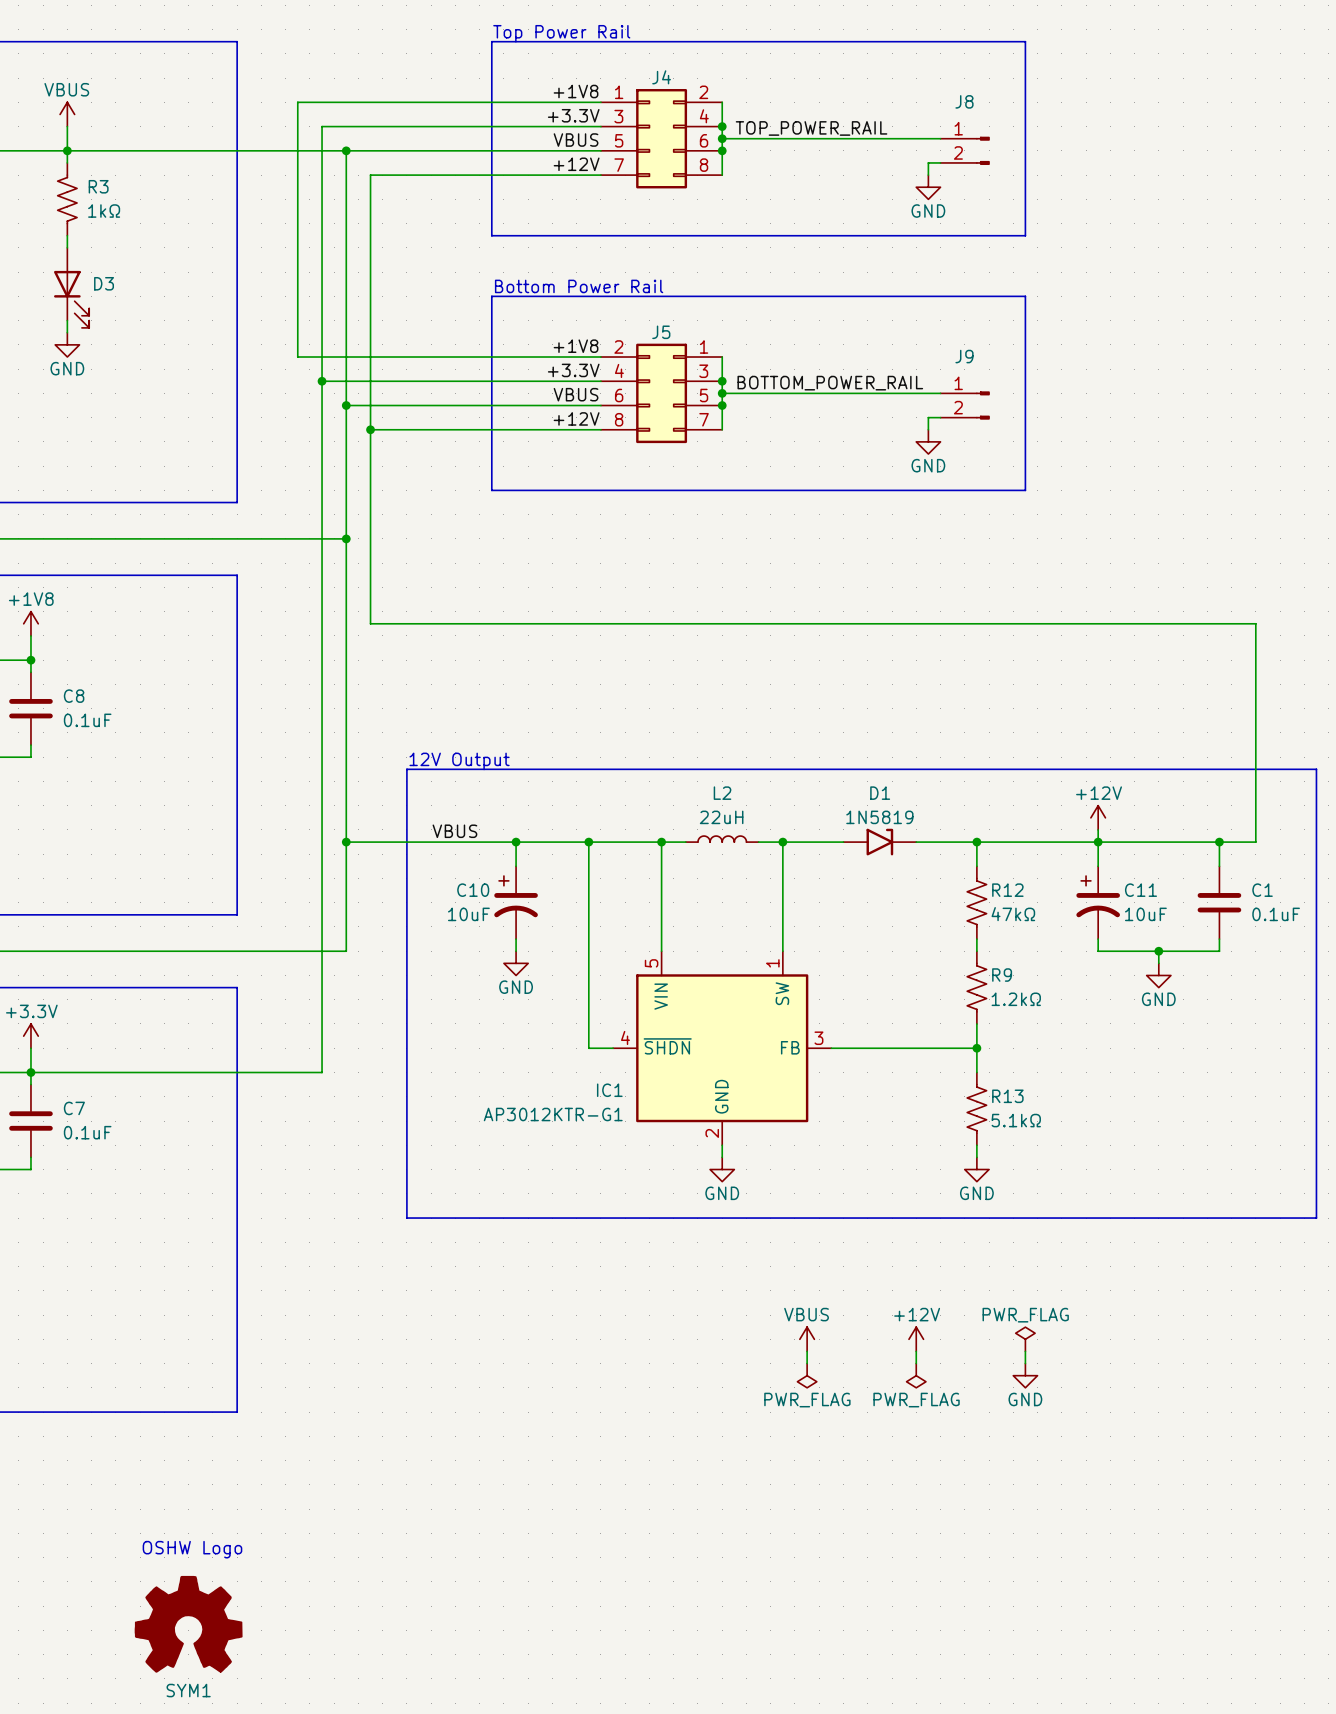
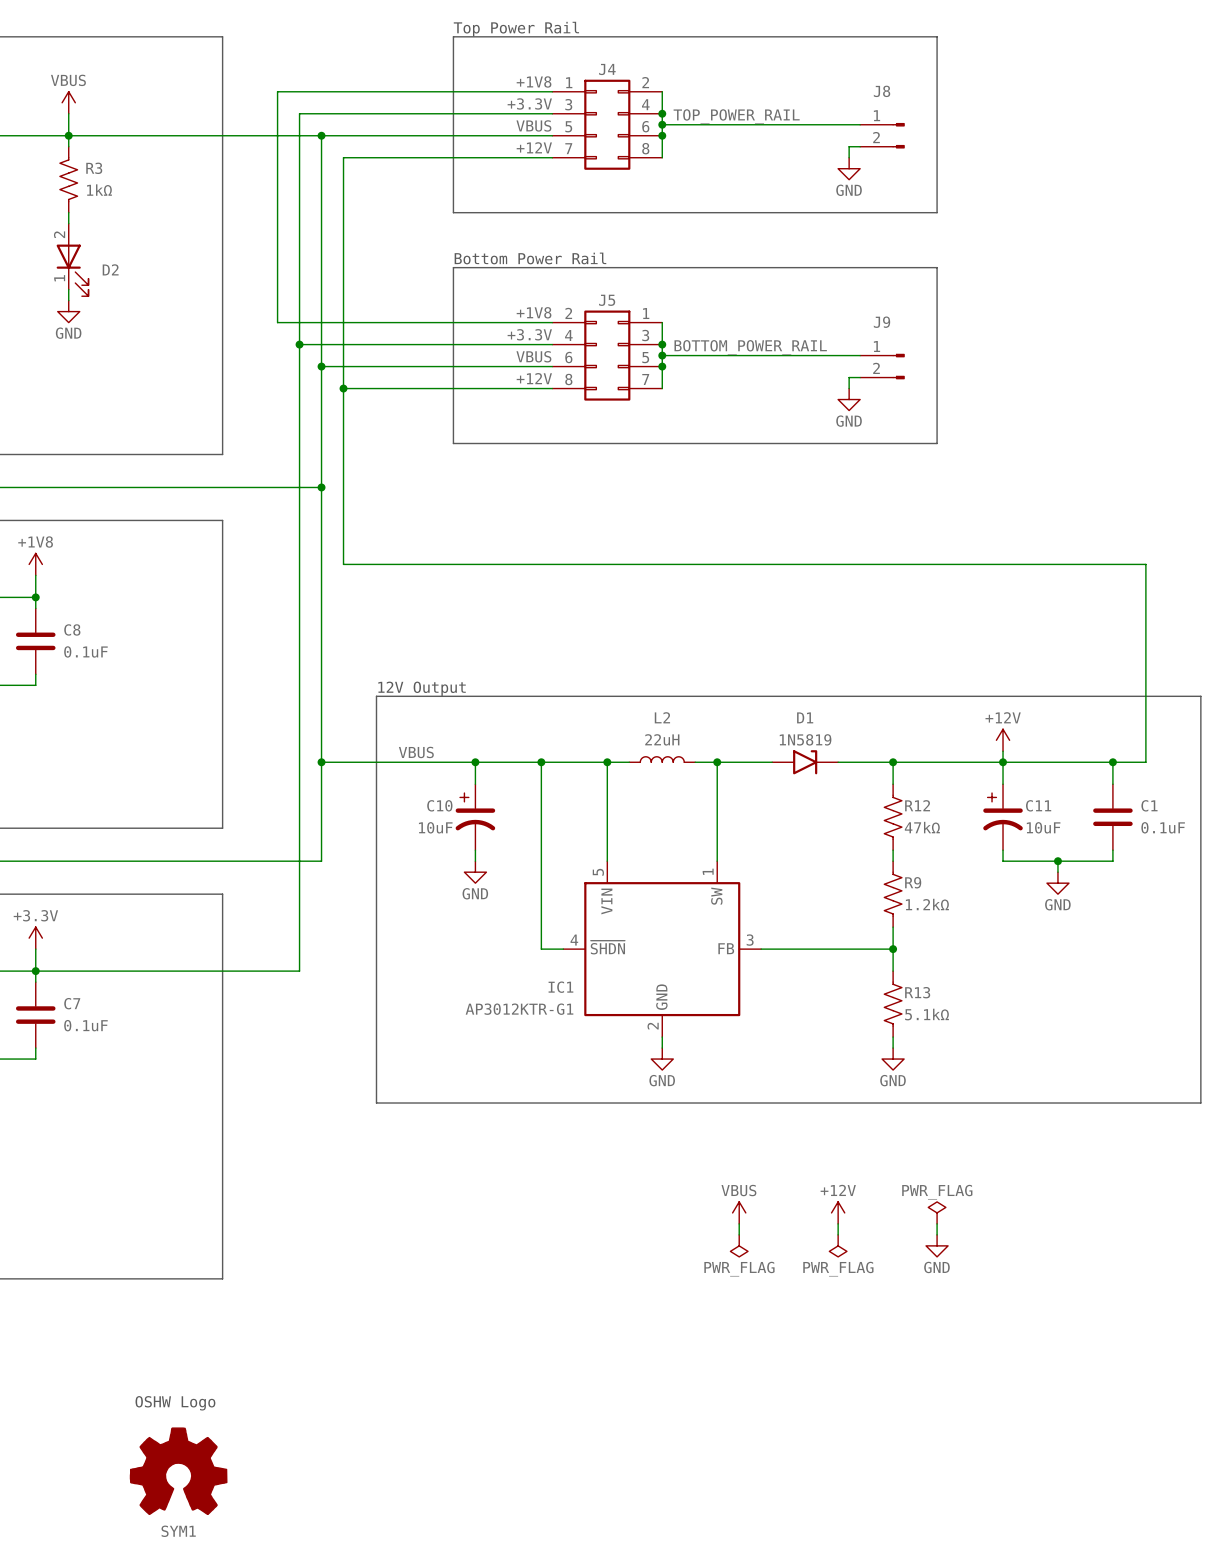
D3 pin number: none -> 2 (59, 234)
D3 name: D3 (104, 283) -> D2 (110, 269)
D3 pin number: none -> 1 (59, 278)

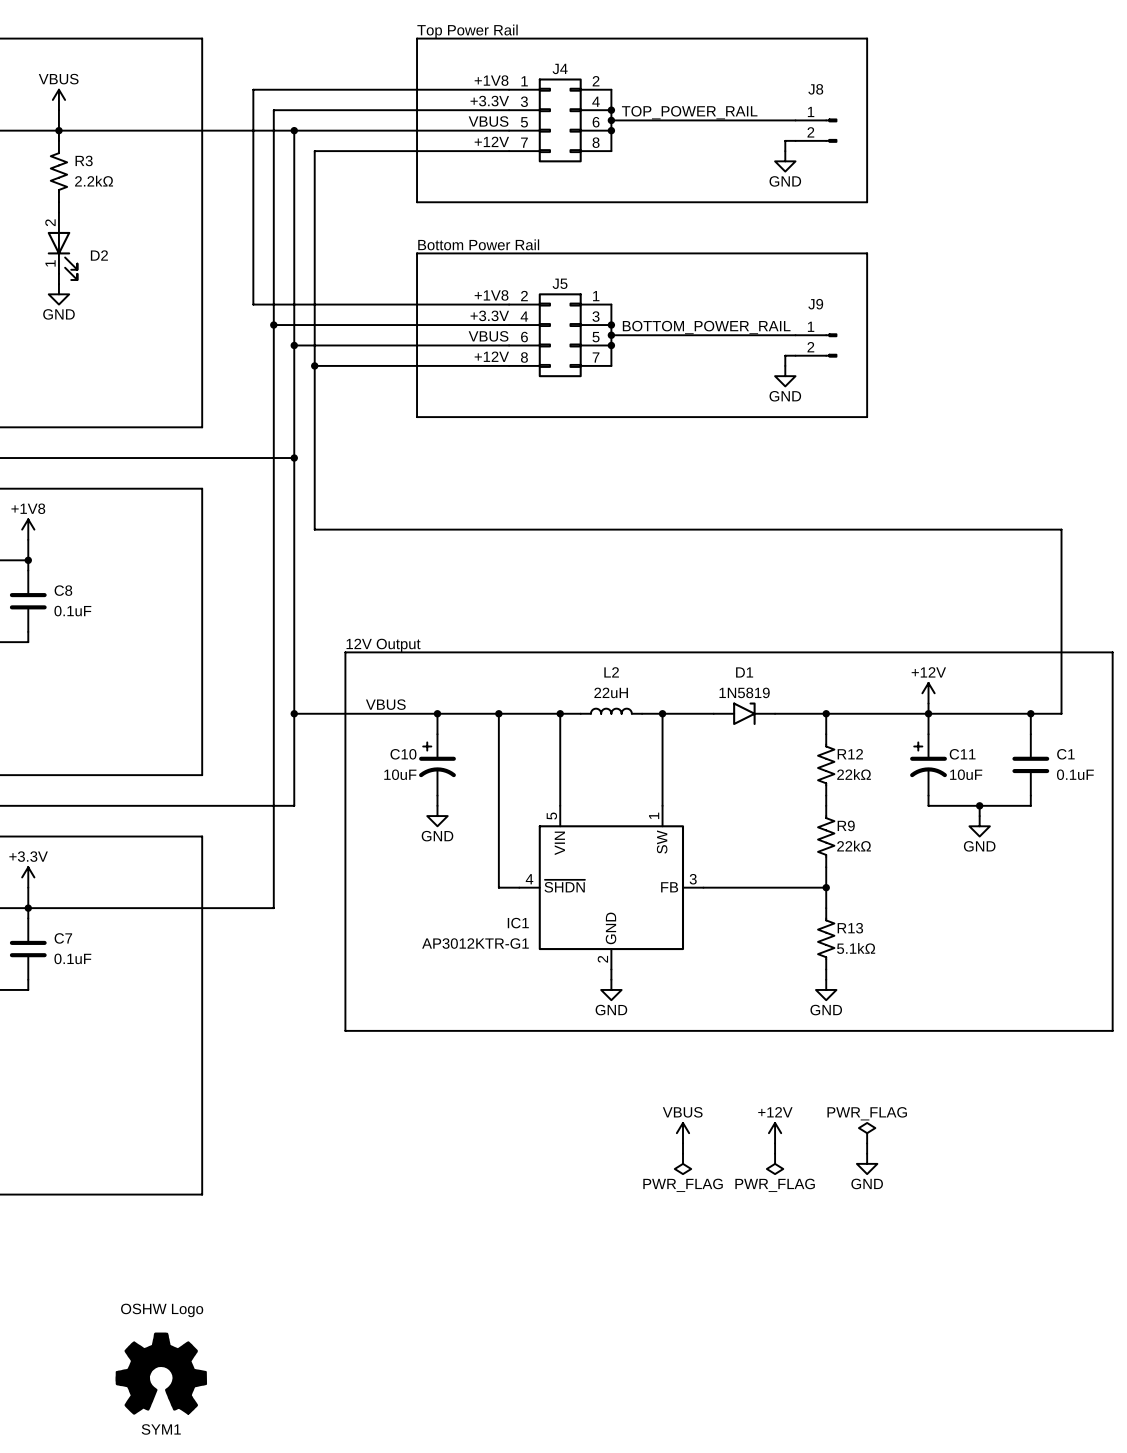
R3 value: 1kΩ (99, 190) -> 2.2kΩ (94, 181)
R12 value: 47kΩ (922, 827) -> 22kΩ (854, 774)
R9 value: 1.2kΩ (927, 904) -> 22kΩ (854, 846)

